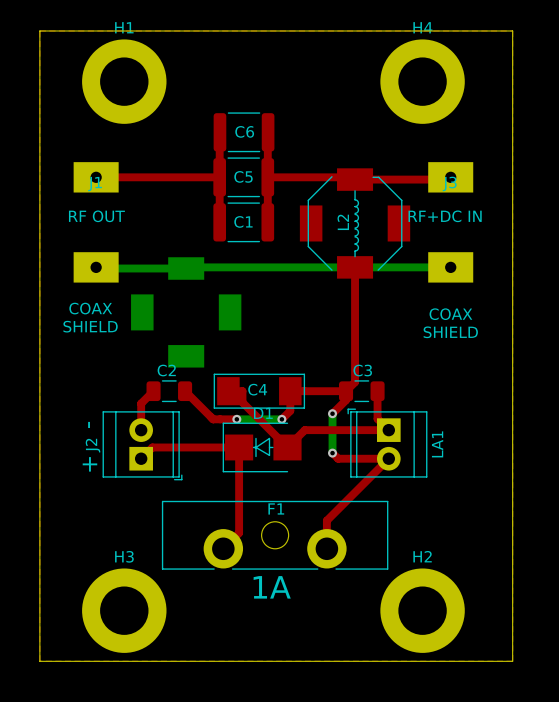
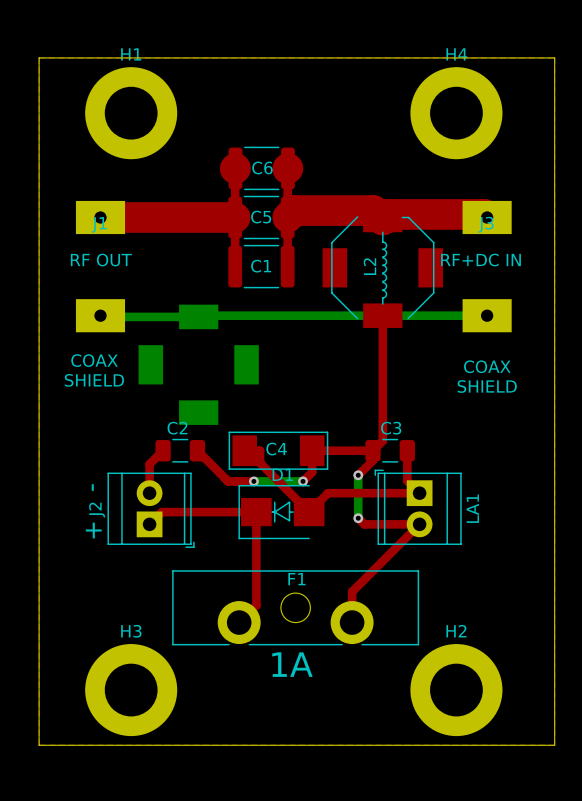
top track width: thin (96, 177) (219, 177) -> thick (100, 217) (235, 217)
top track: (267, 177) (352, 177) -> (287, 217) (294, 210) (373, 210) (382, 219) (388, 214) (484, 214) (487, 217)

